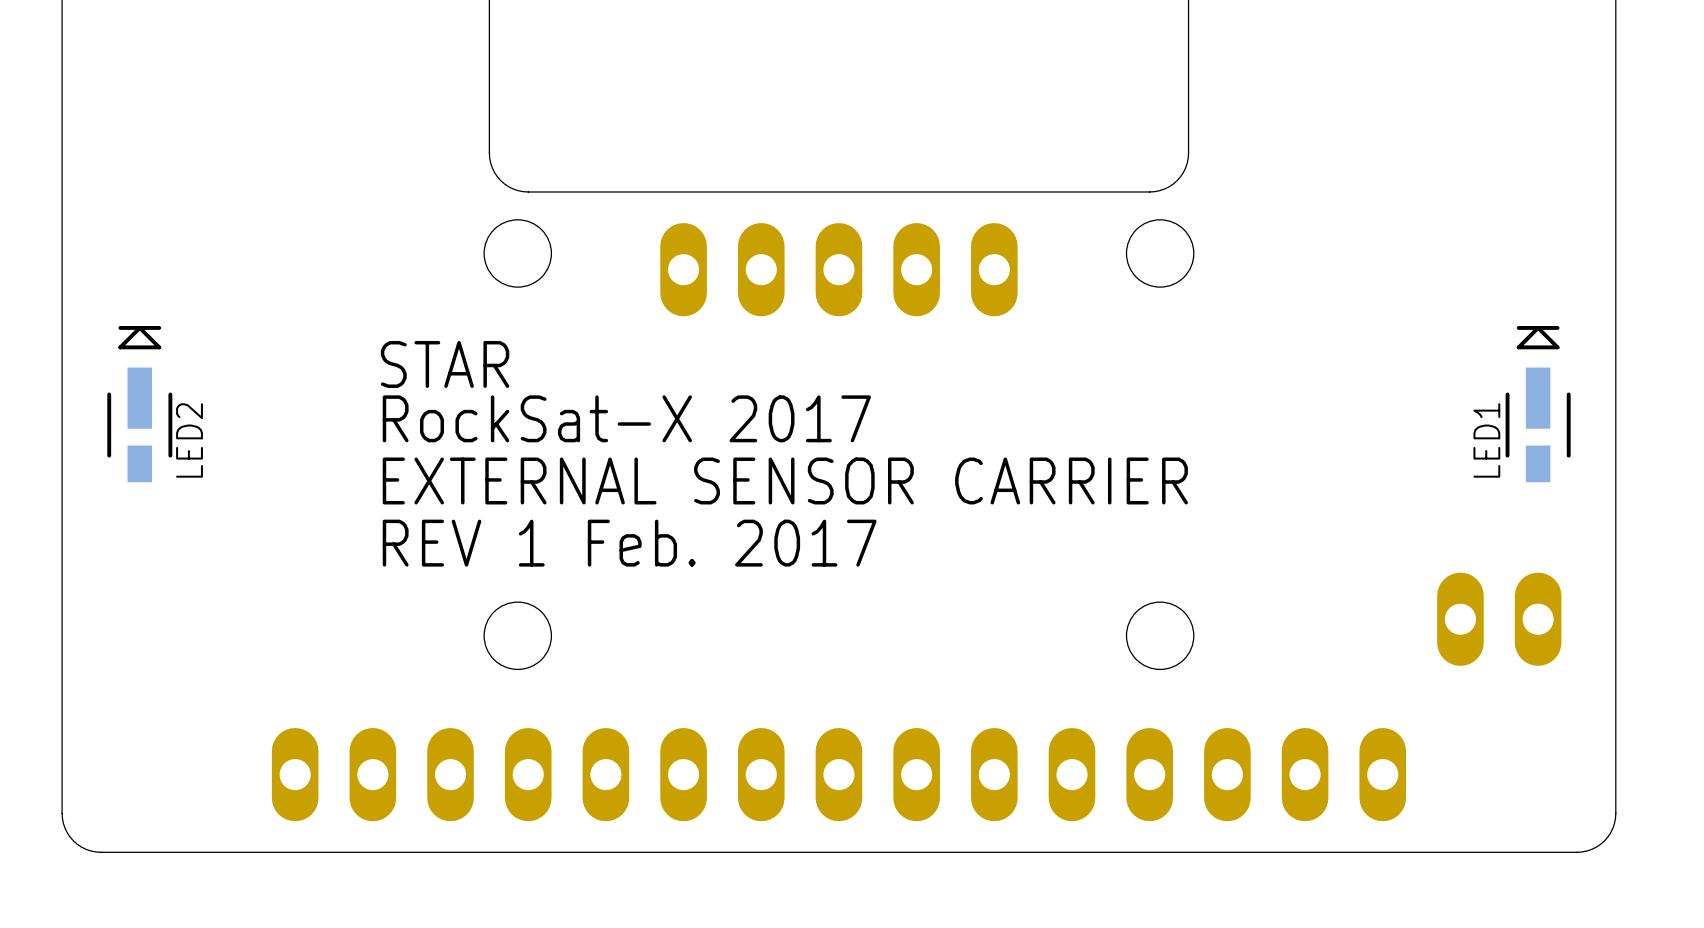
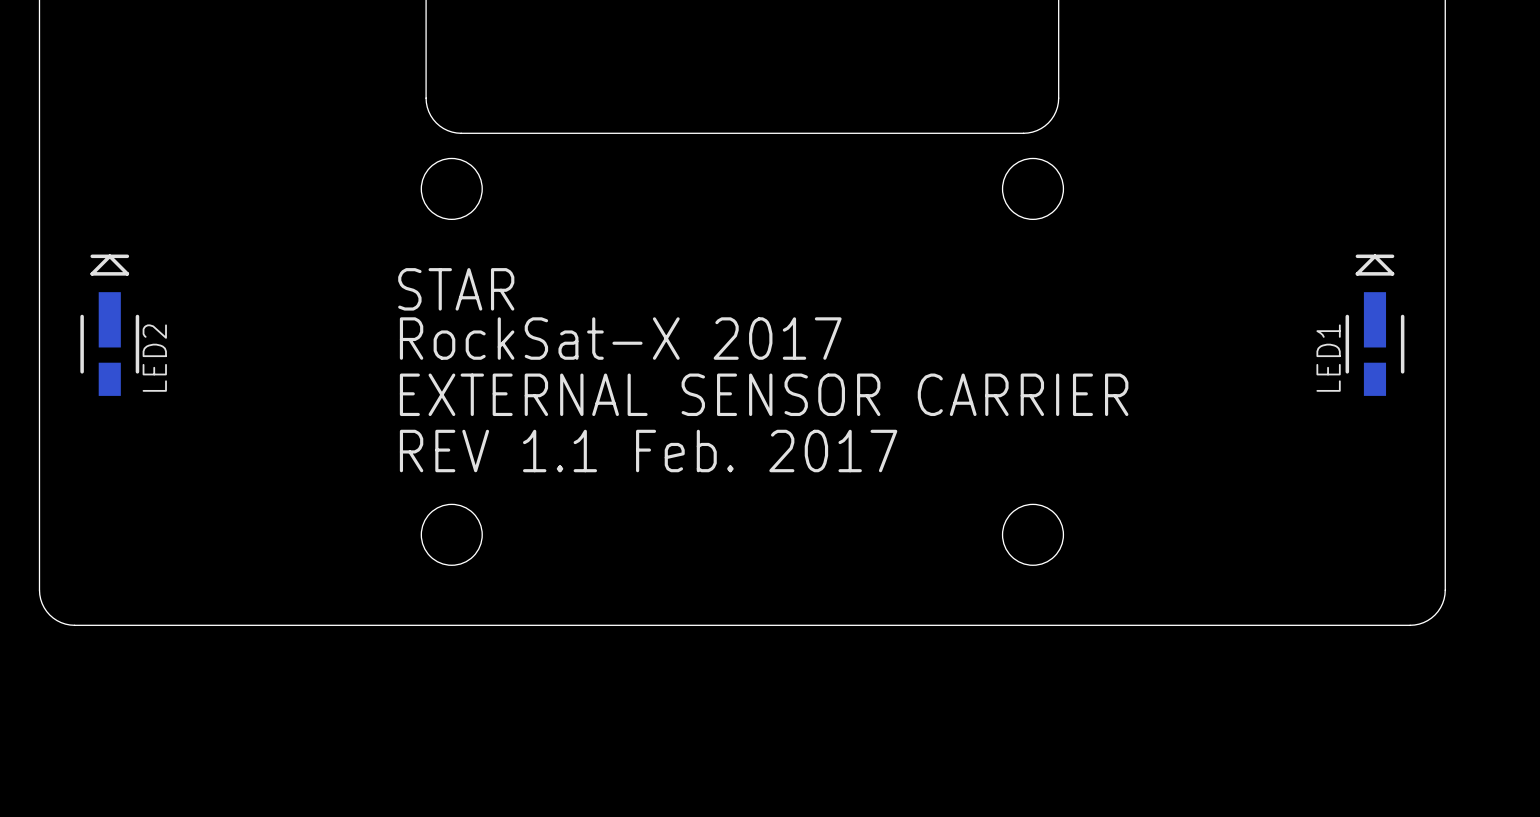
part: (838, 269) -> none
text position: STAR (445, 364) -> STAR (456, 289)
text position: RockSat-X 2017 (626, 418) -> RockSat-X 2017 (620, 338)
text position: EXTERNAL SENSOR CARRIER (785, 480) -> EXTERNAL SENSOR CARRIER (764, 394)
text: REV 1 Feb. 2017 (629, 543) -> REV 1.1 Feb. 2017 (648, 451)
part: (1499, 619) -> none
board edge: (1615, 696) (1614, 823) (1610, 832) (1600, 844) (1587, 850) (1576, 852) (95, 851) (77, 844) (67, 832) (63, 823) (62, 696) -> (1445, 590) (1442, 603) (1434, 615) (1423, 622) (1410, 625) (74, 625) (61, 622) (49, 615) (42, 603) (39, 590)
part: (838, 774) -> none

